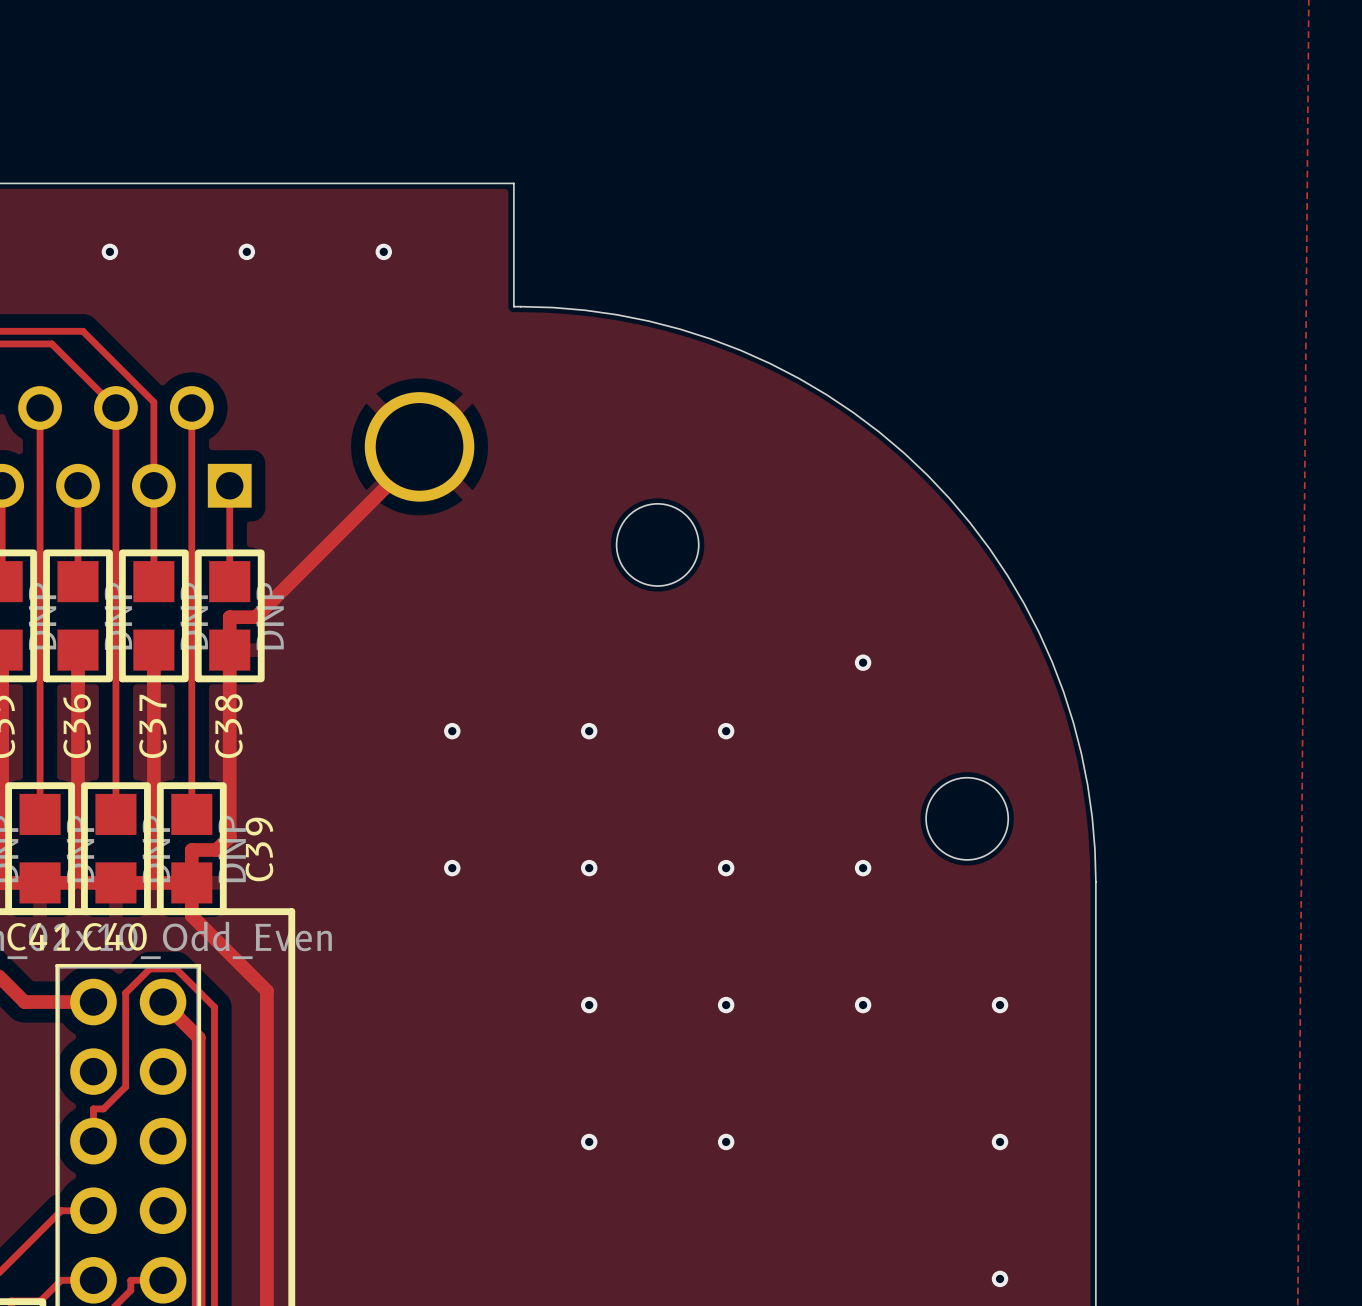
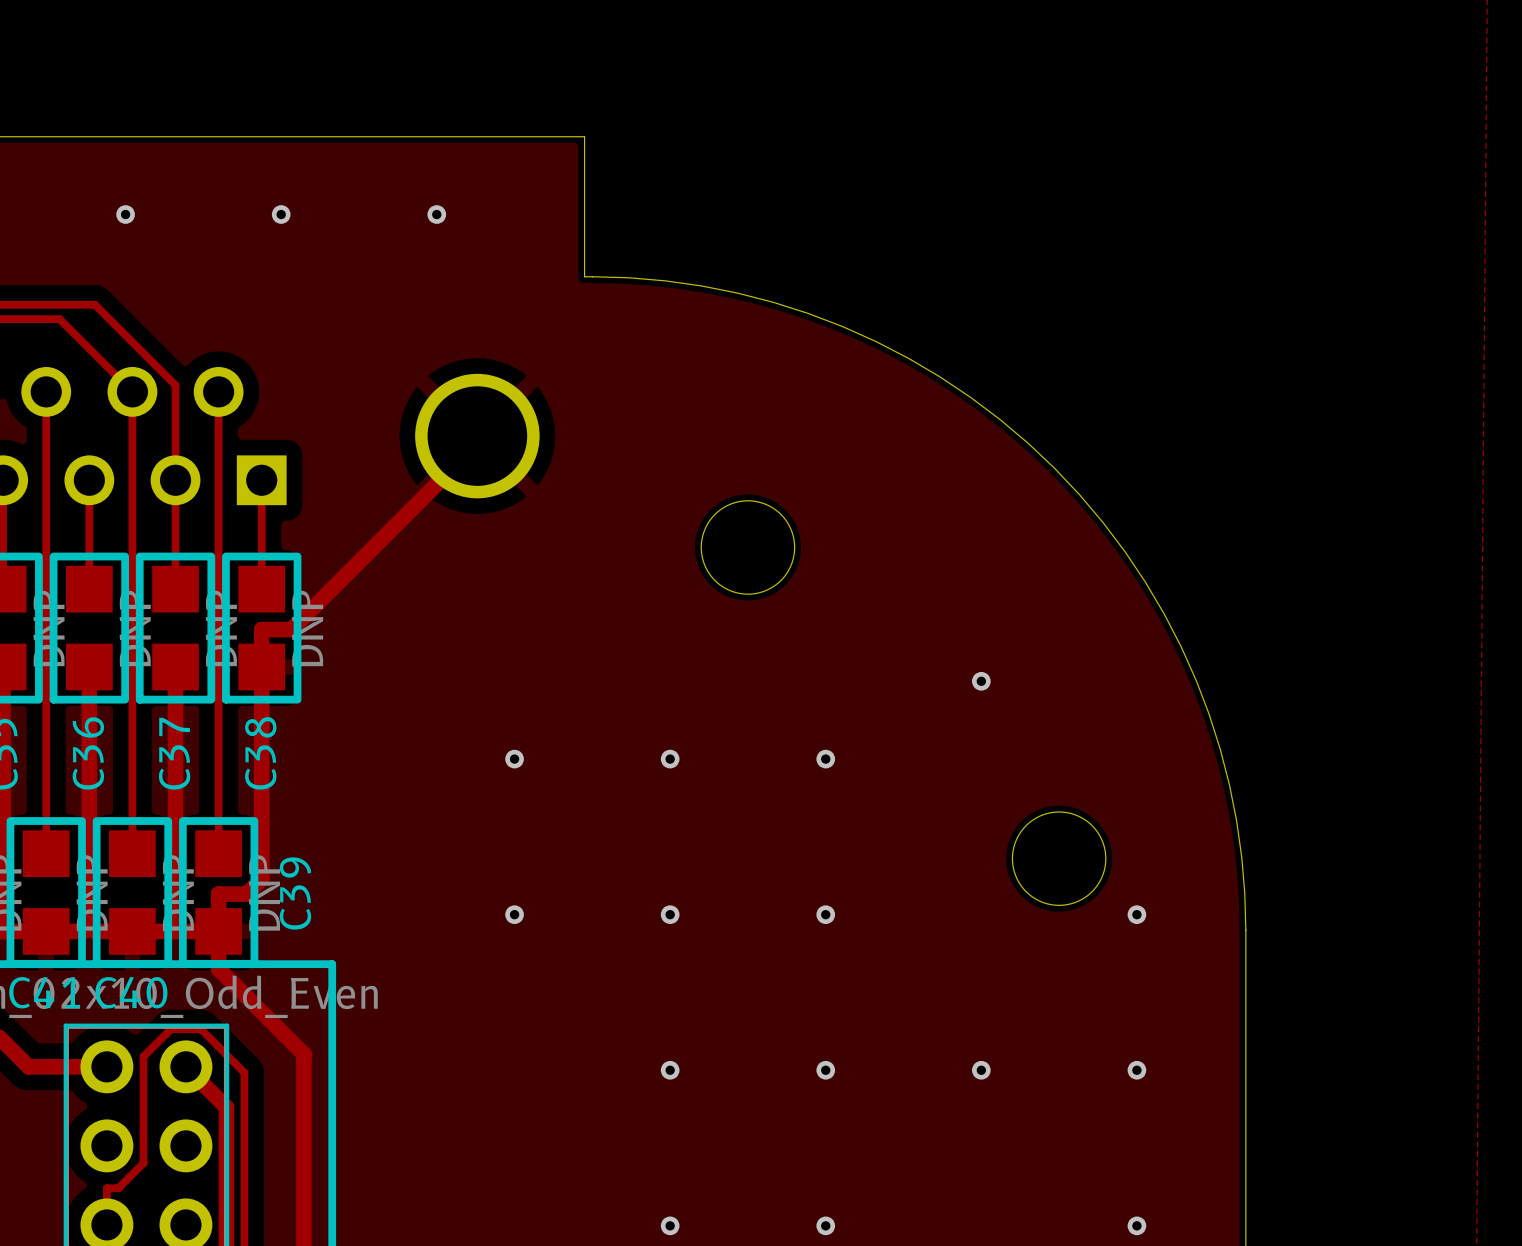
round board edge position: (967, 818) -> (1059, 858)
via position: (863, 868) -> (1136, 914)

